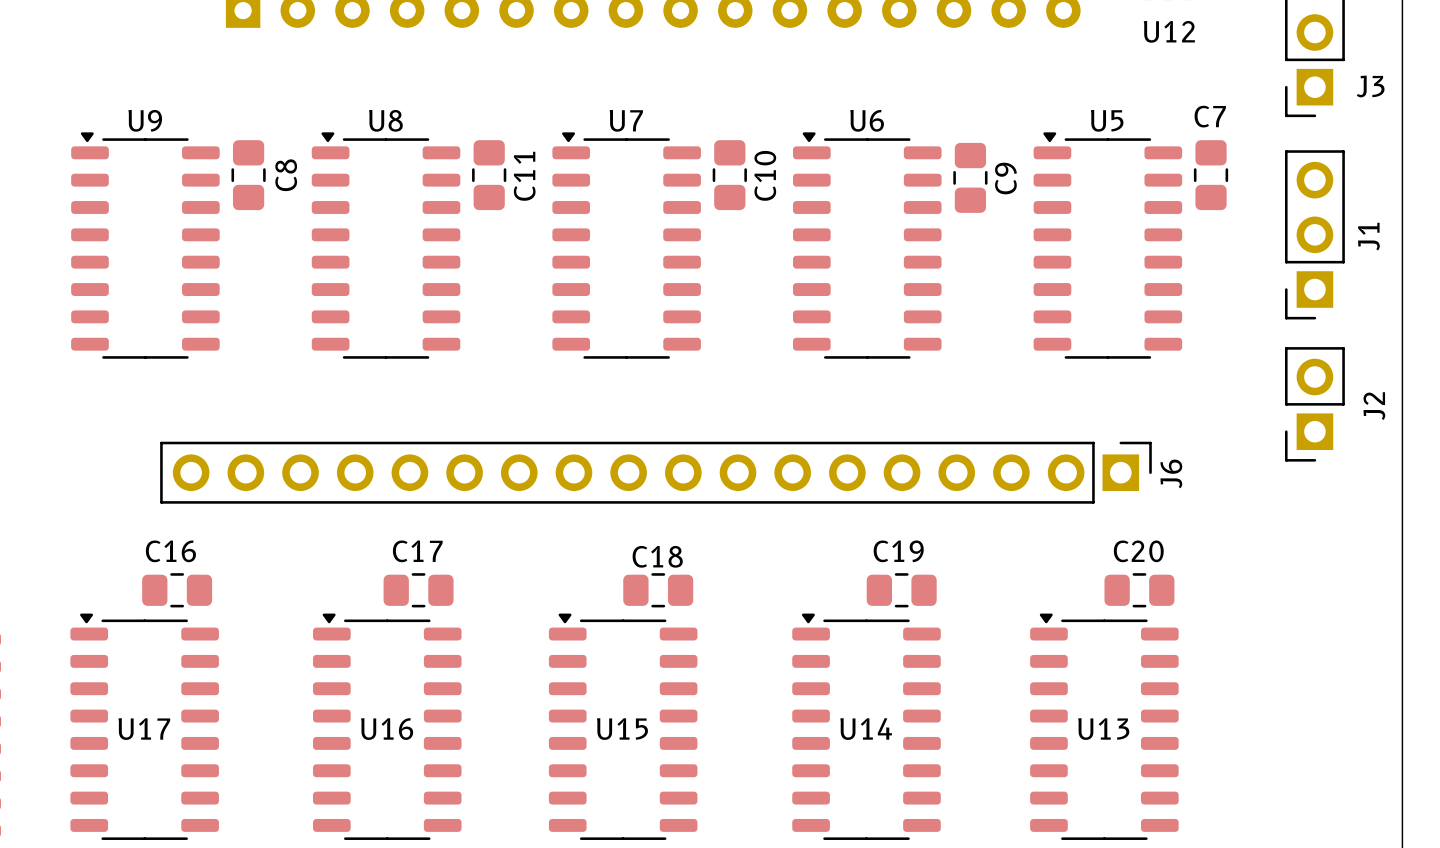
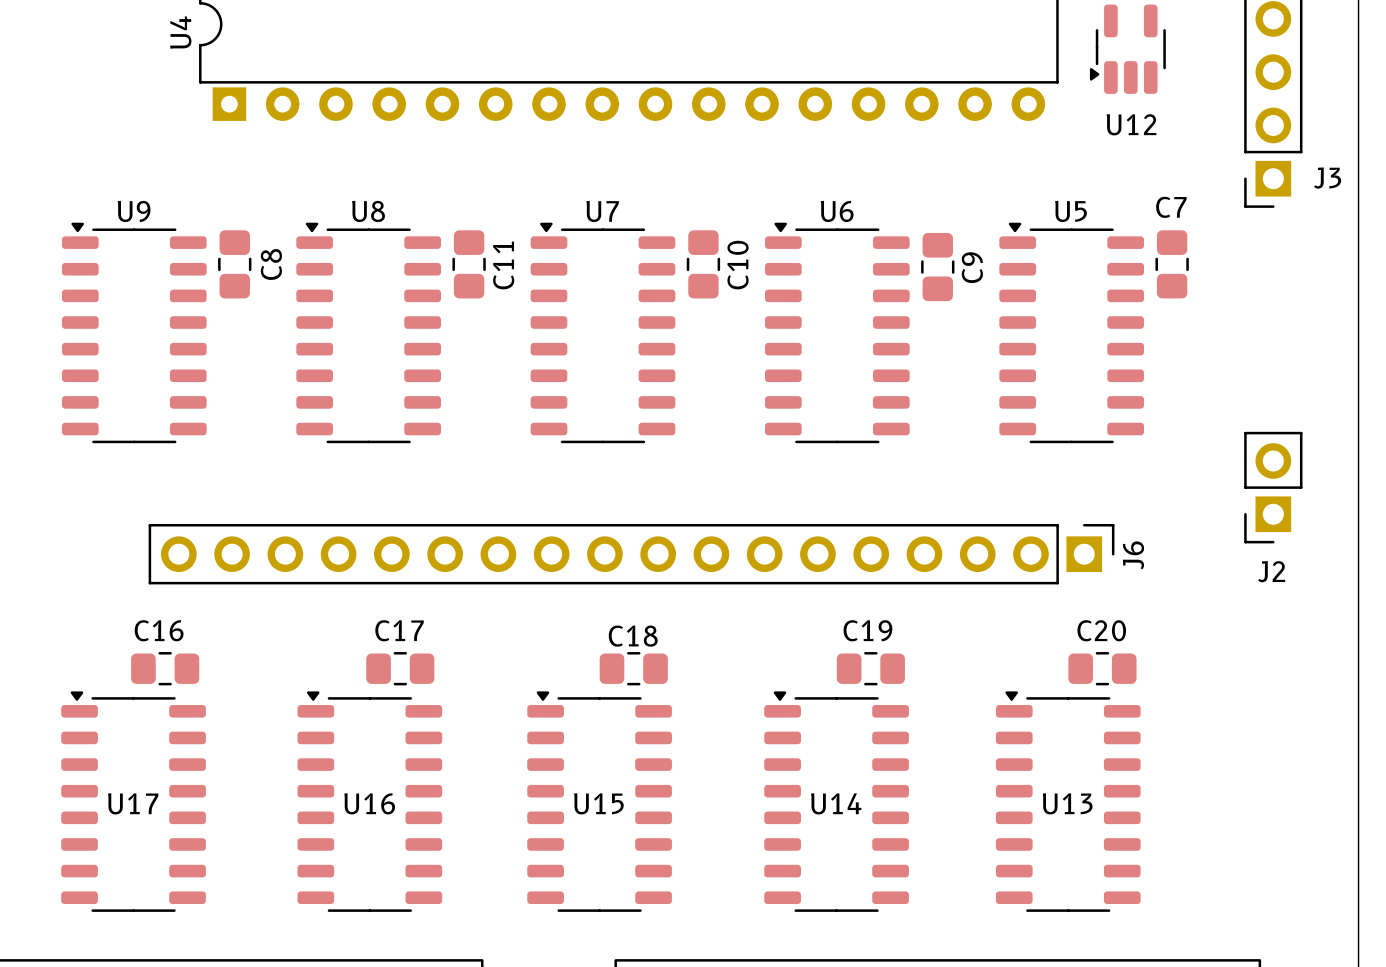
J1: (1314, 234) -> none
J2 name rotation: 0° (1374, 406) -> 90° clockwise (1271, 571)
J2 name position: J2 (1374, 406) -> J2 (1271, 571)

